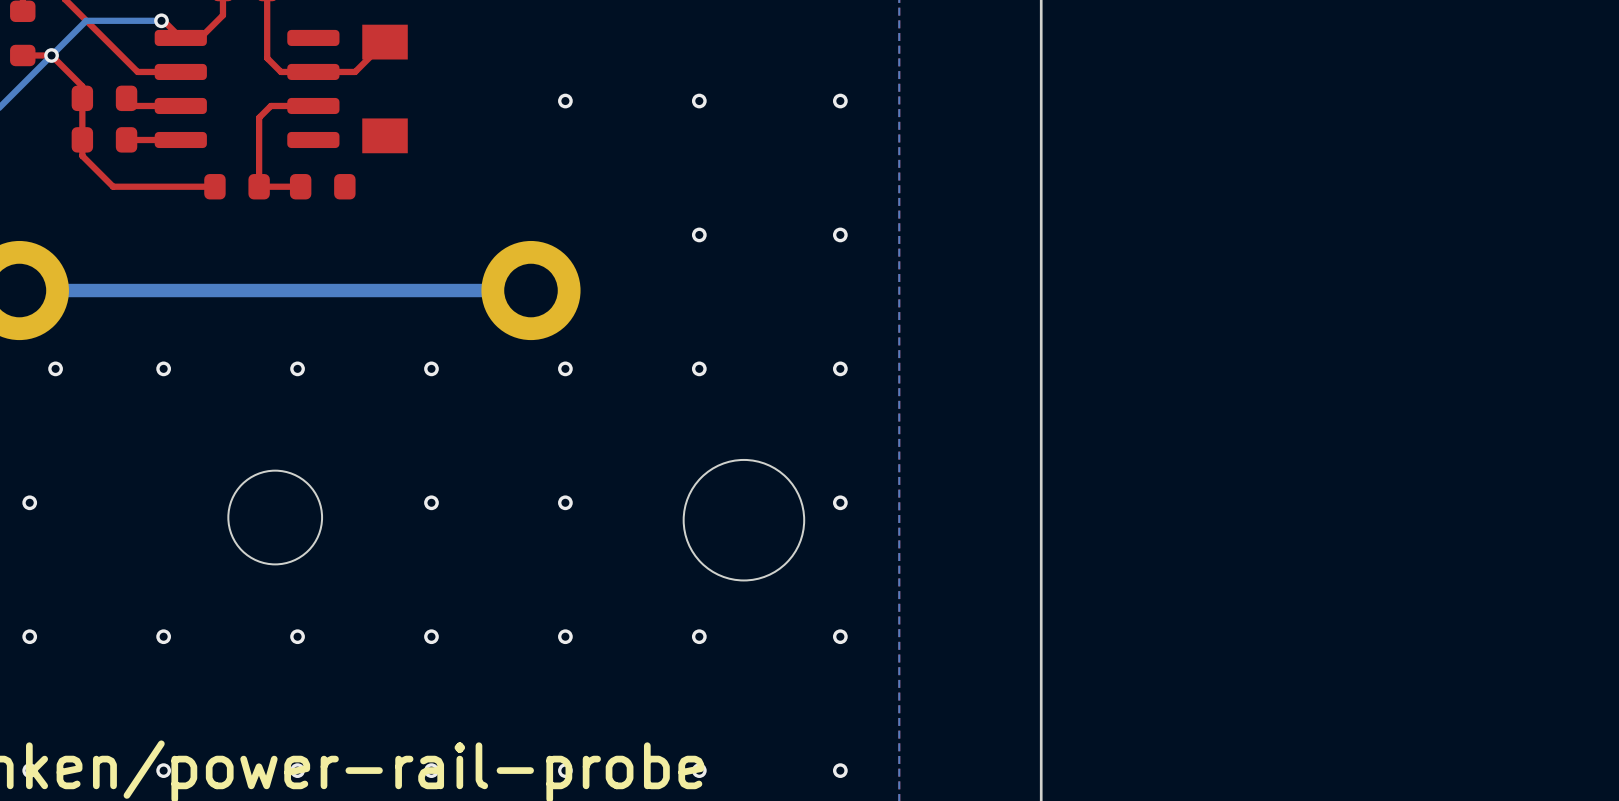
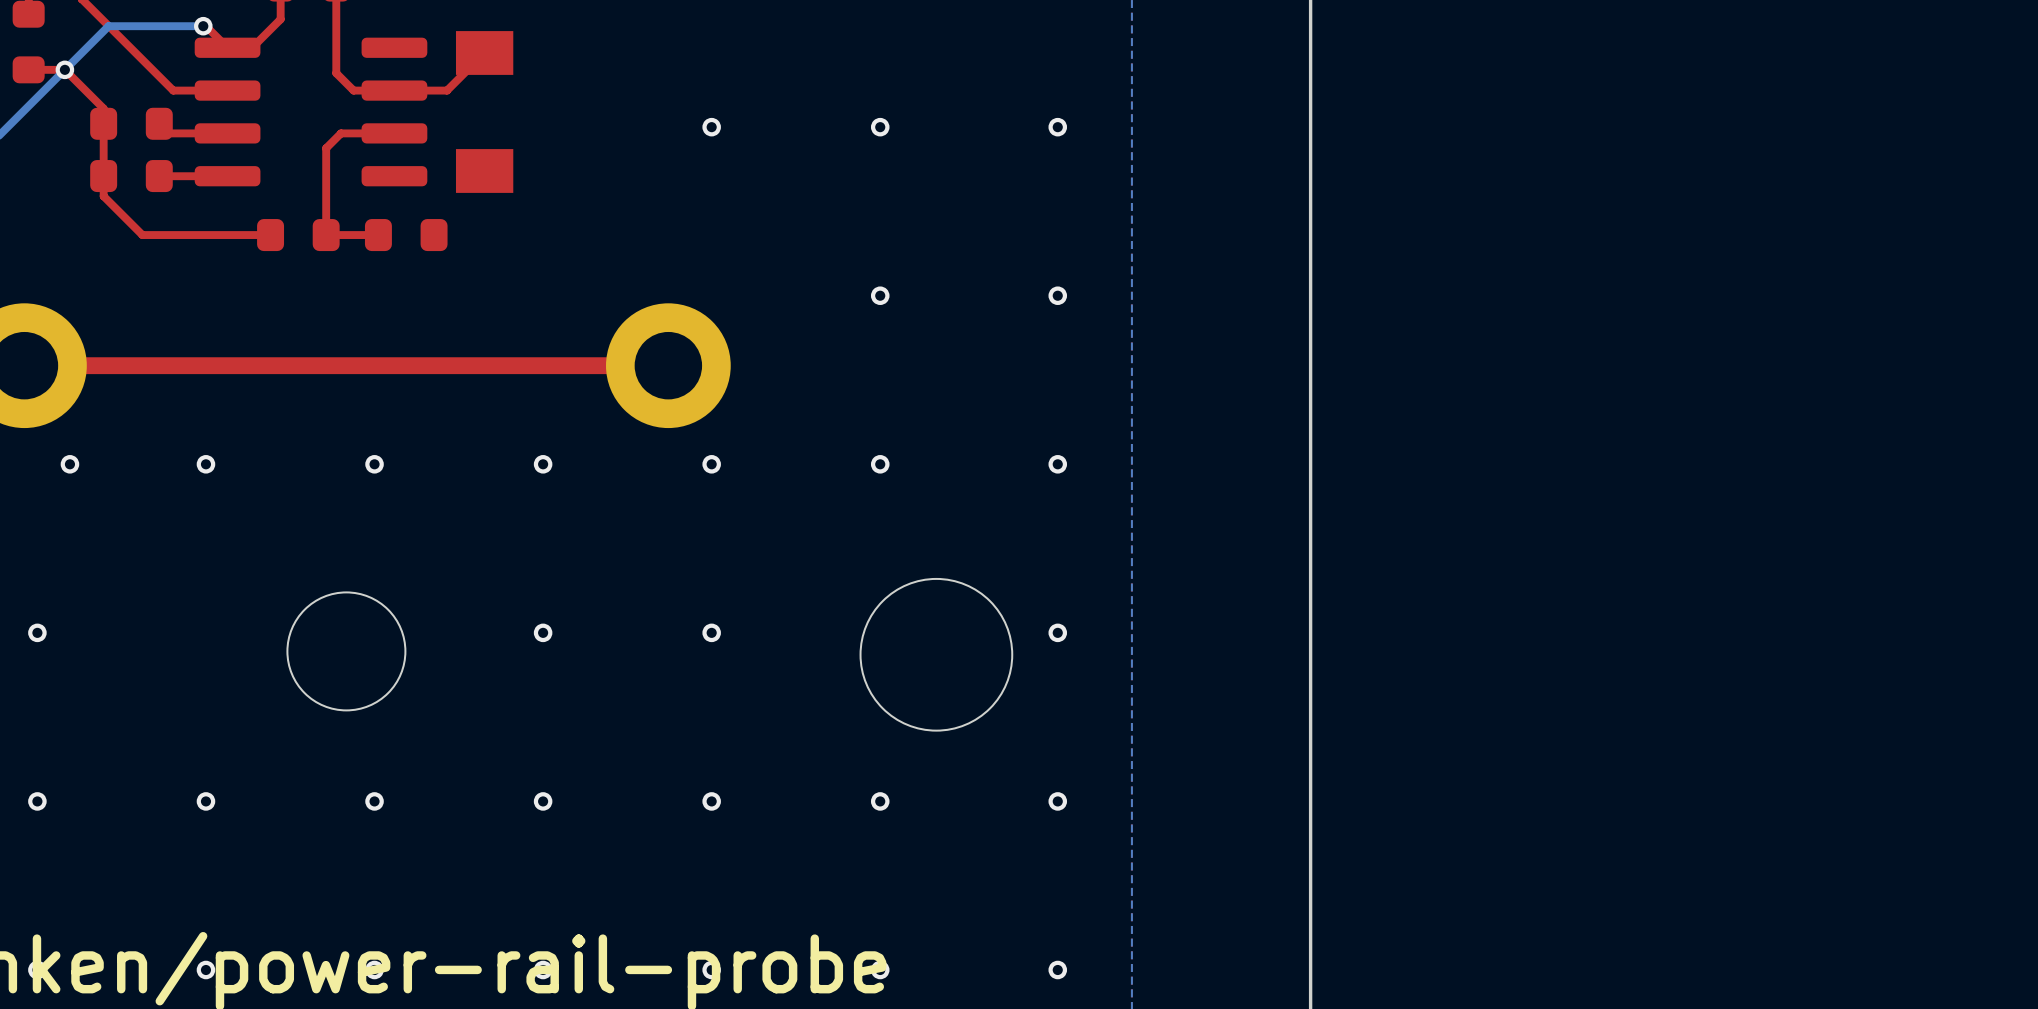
bottom track: (530, 290) (19, 290) -> none
top track: none -> (668, 365) (24, 365)

